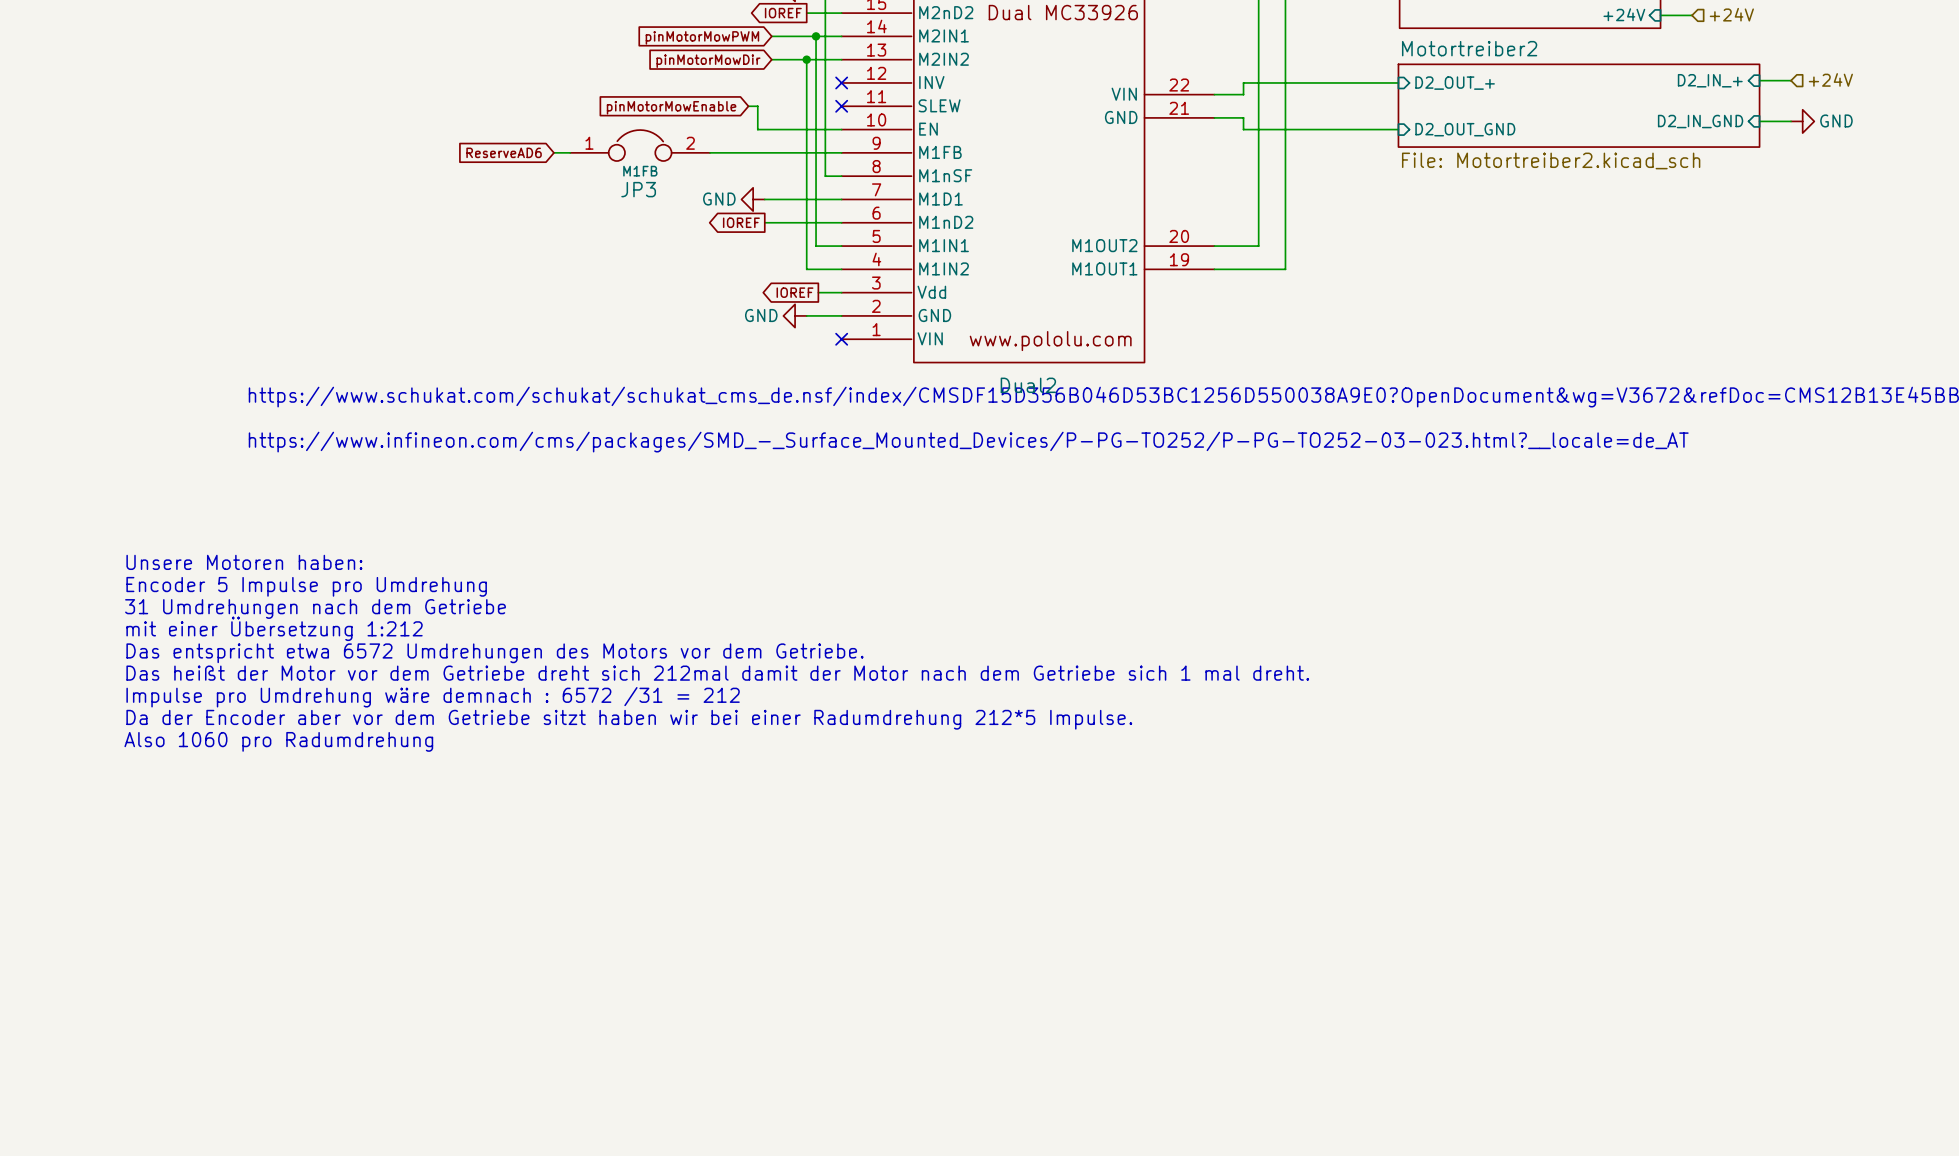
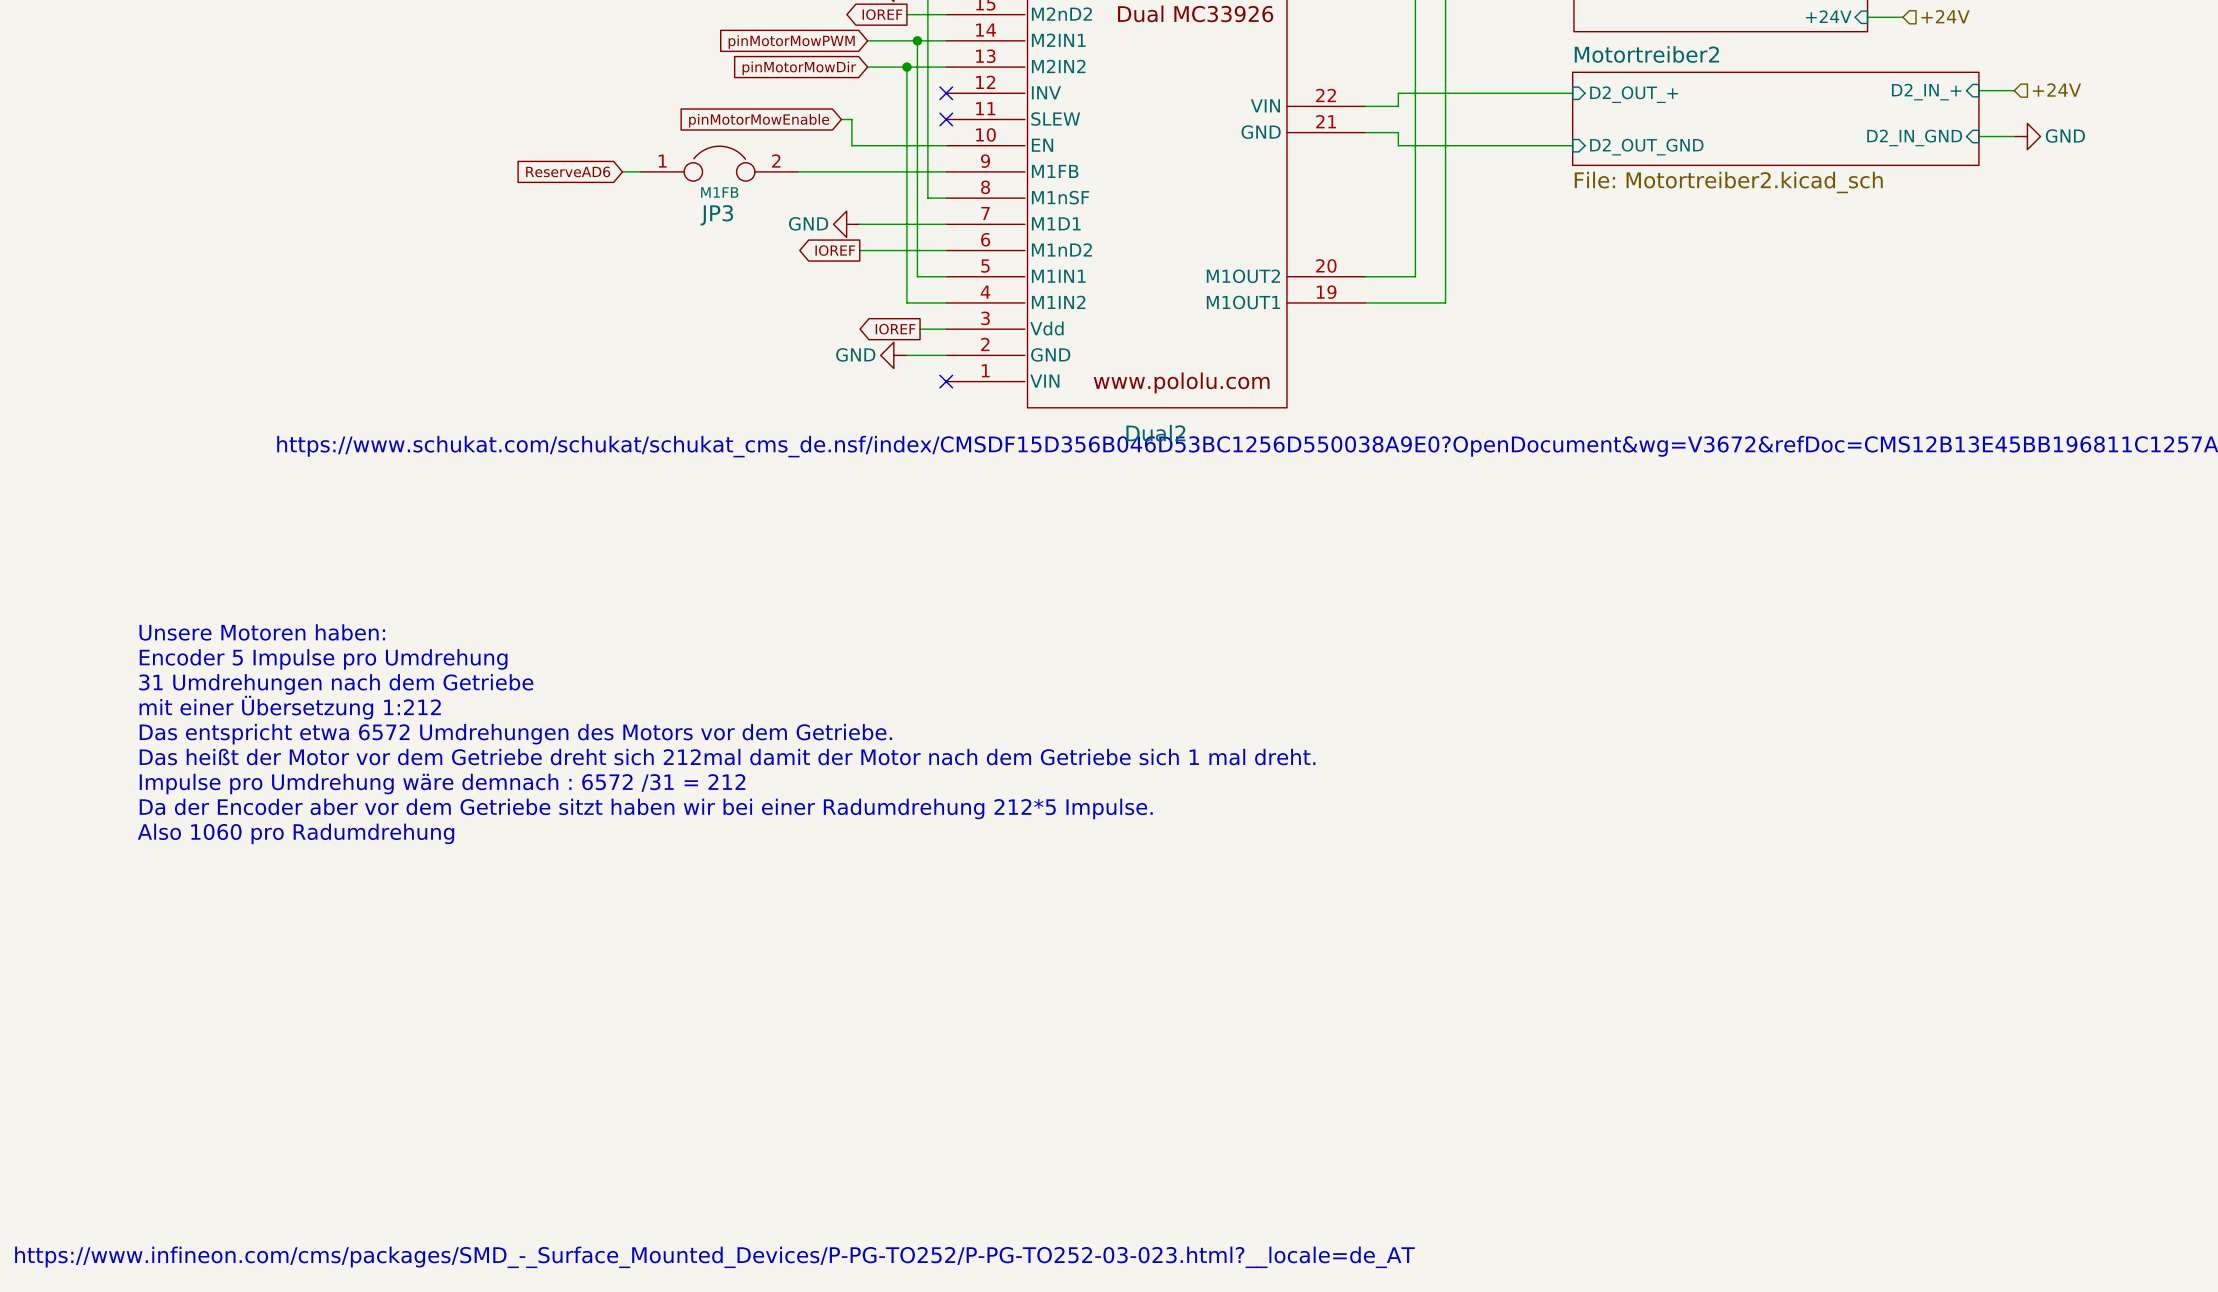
text: https://www.infineon.com/cms/packages/SMD_-_Surface_Mounted_Devices/P-PG-TO252/P-PG-TO252-03-023.html?__locale=de_AT (968, 442) -> none
text: none -> https://www.infineon.com/cms/packages/SMD_-_Surface_Mounted_Devices/P-PG-TO252/P-PG-TO252-03-023.html?__locale=de_AT (714, 1257)

